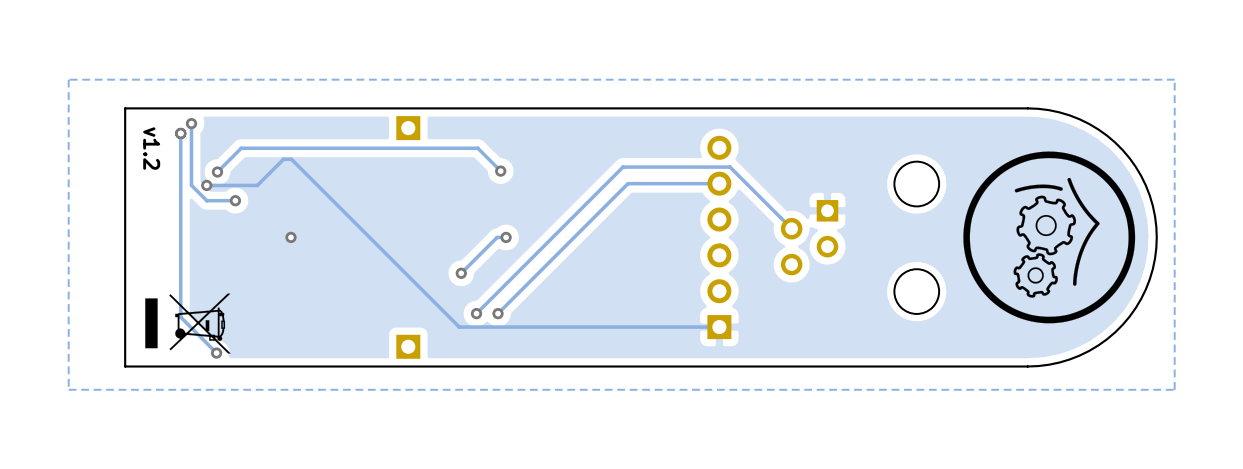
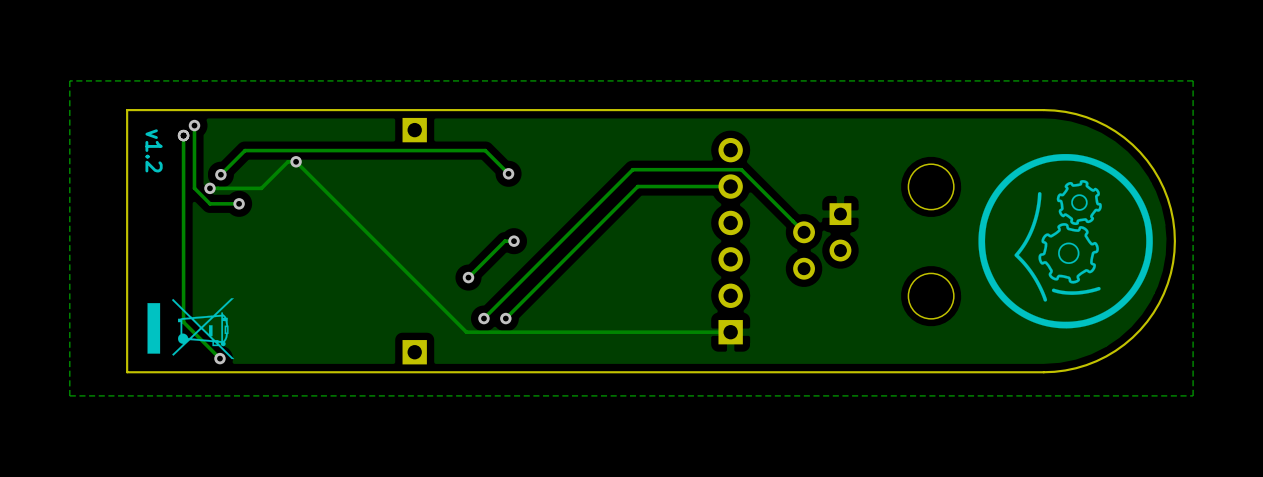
drawing shape: [963, 151, 1136, 324] -> [978, 153, 1153, 329]
via position: (290, 237) -> (296, 161)

